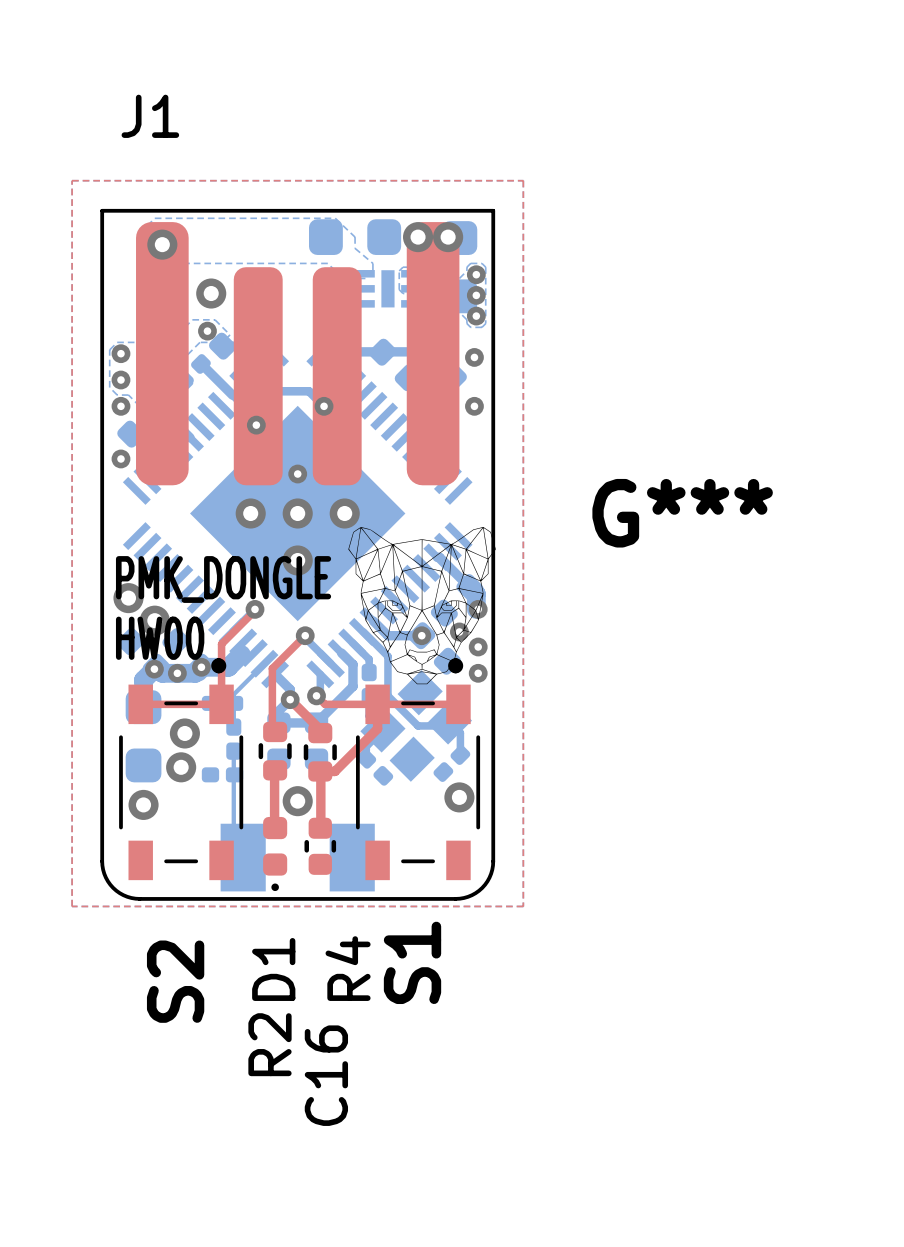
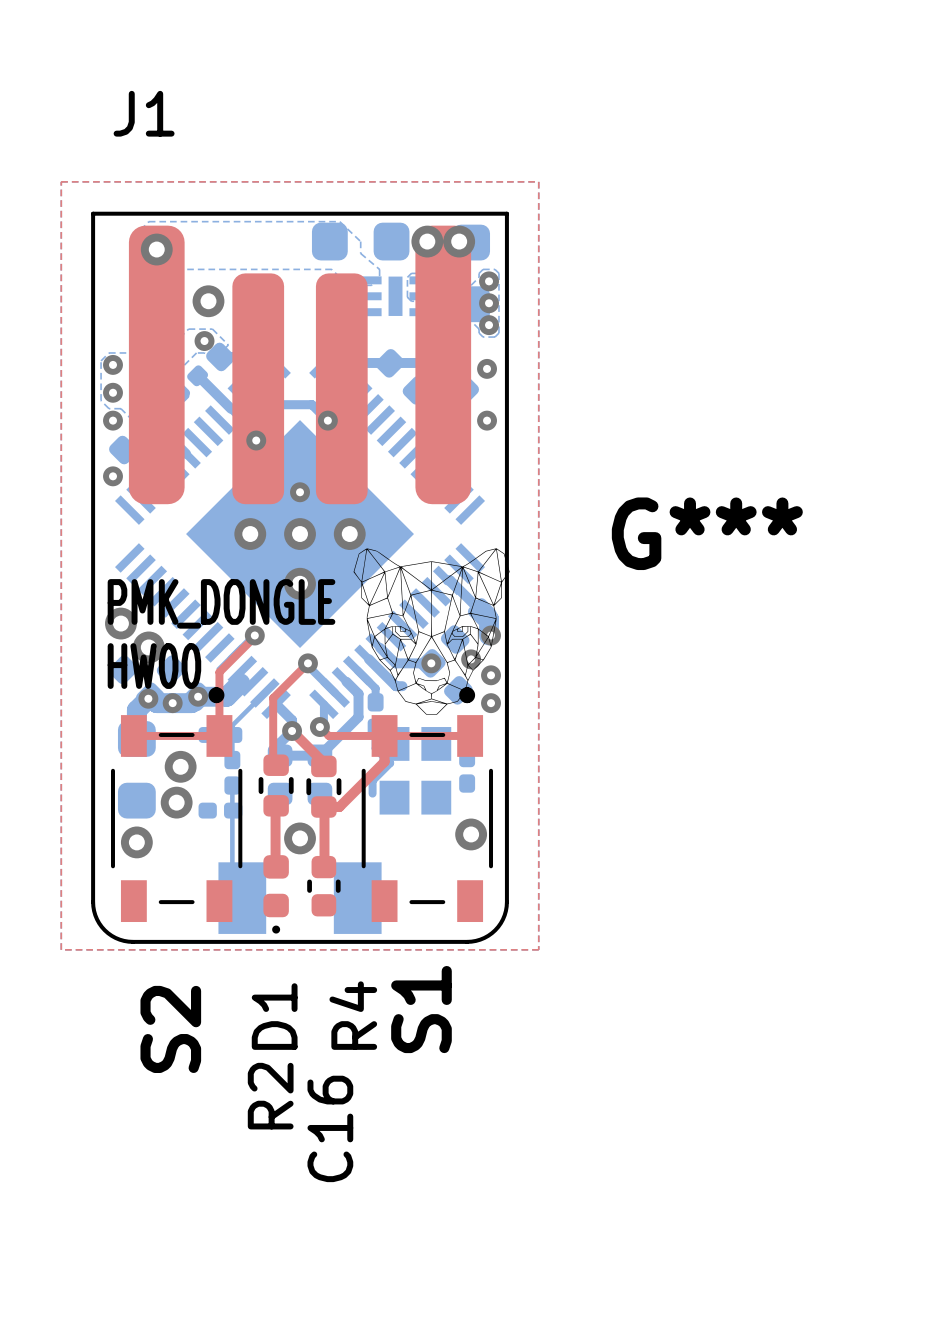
bottom track: (363, 631) (387, 656) (387, 695) (418, 725) (445, 725) (449, 721) (460, 732) (460, 755) -> (368, 659) (395, 686) (402, 686)
part footprint: [360, 670, 473, 782] -> [379, 727, 452, 815]
part: none -> (467, 770)
part: (451, 763) -> none
part: (374, 767) -> none

